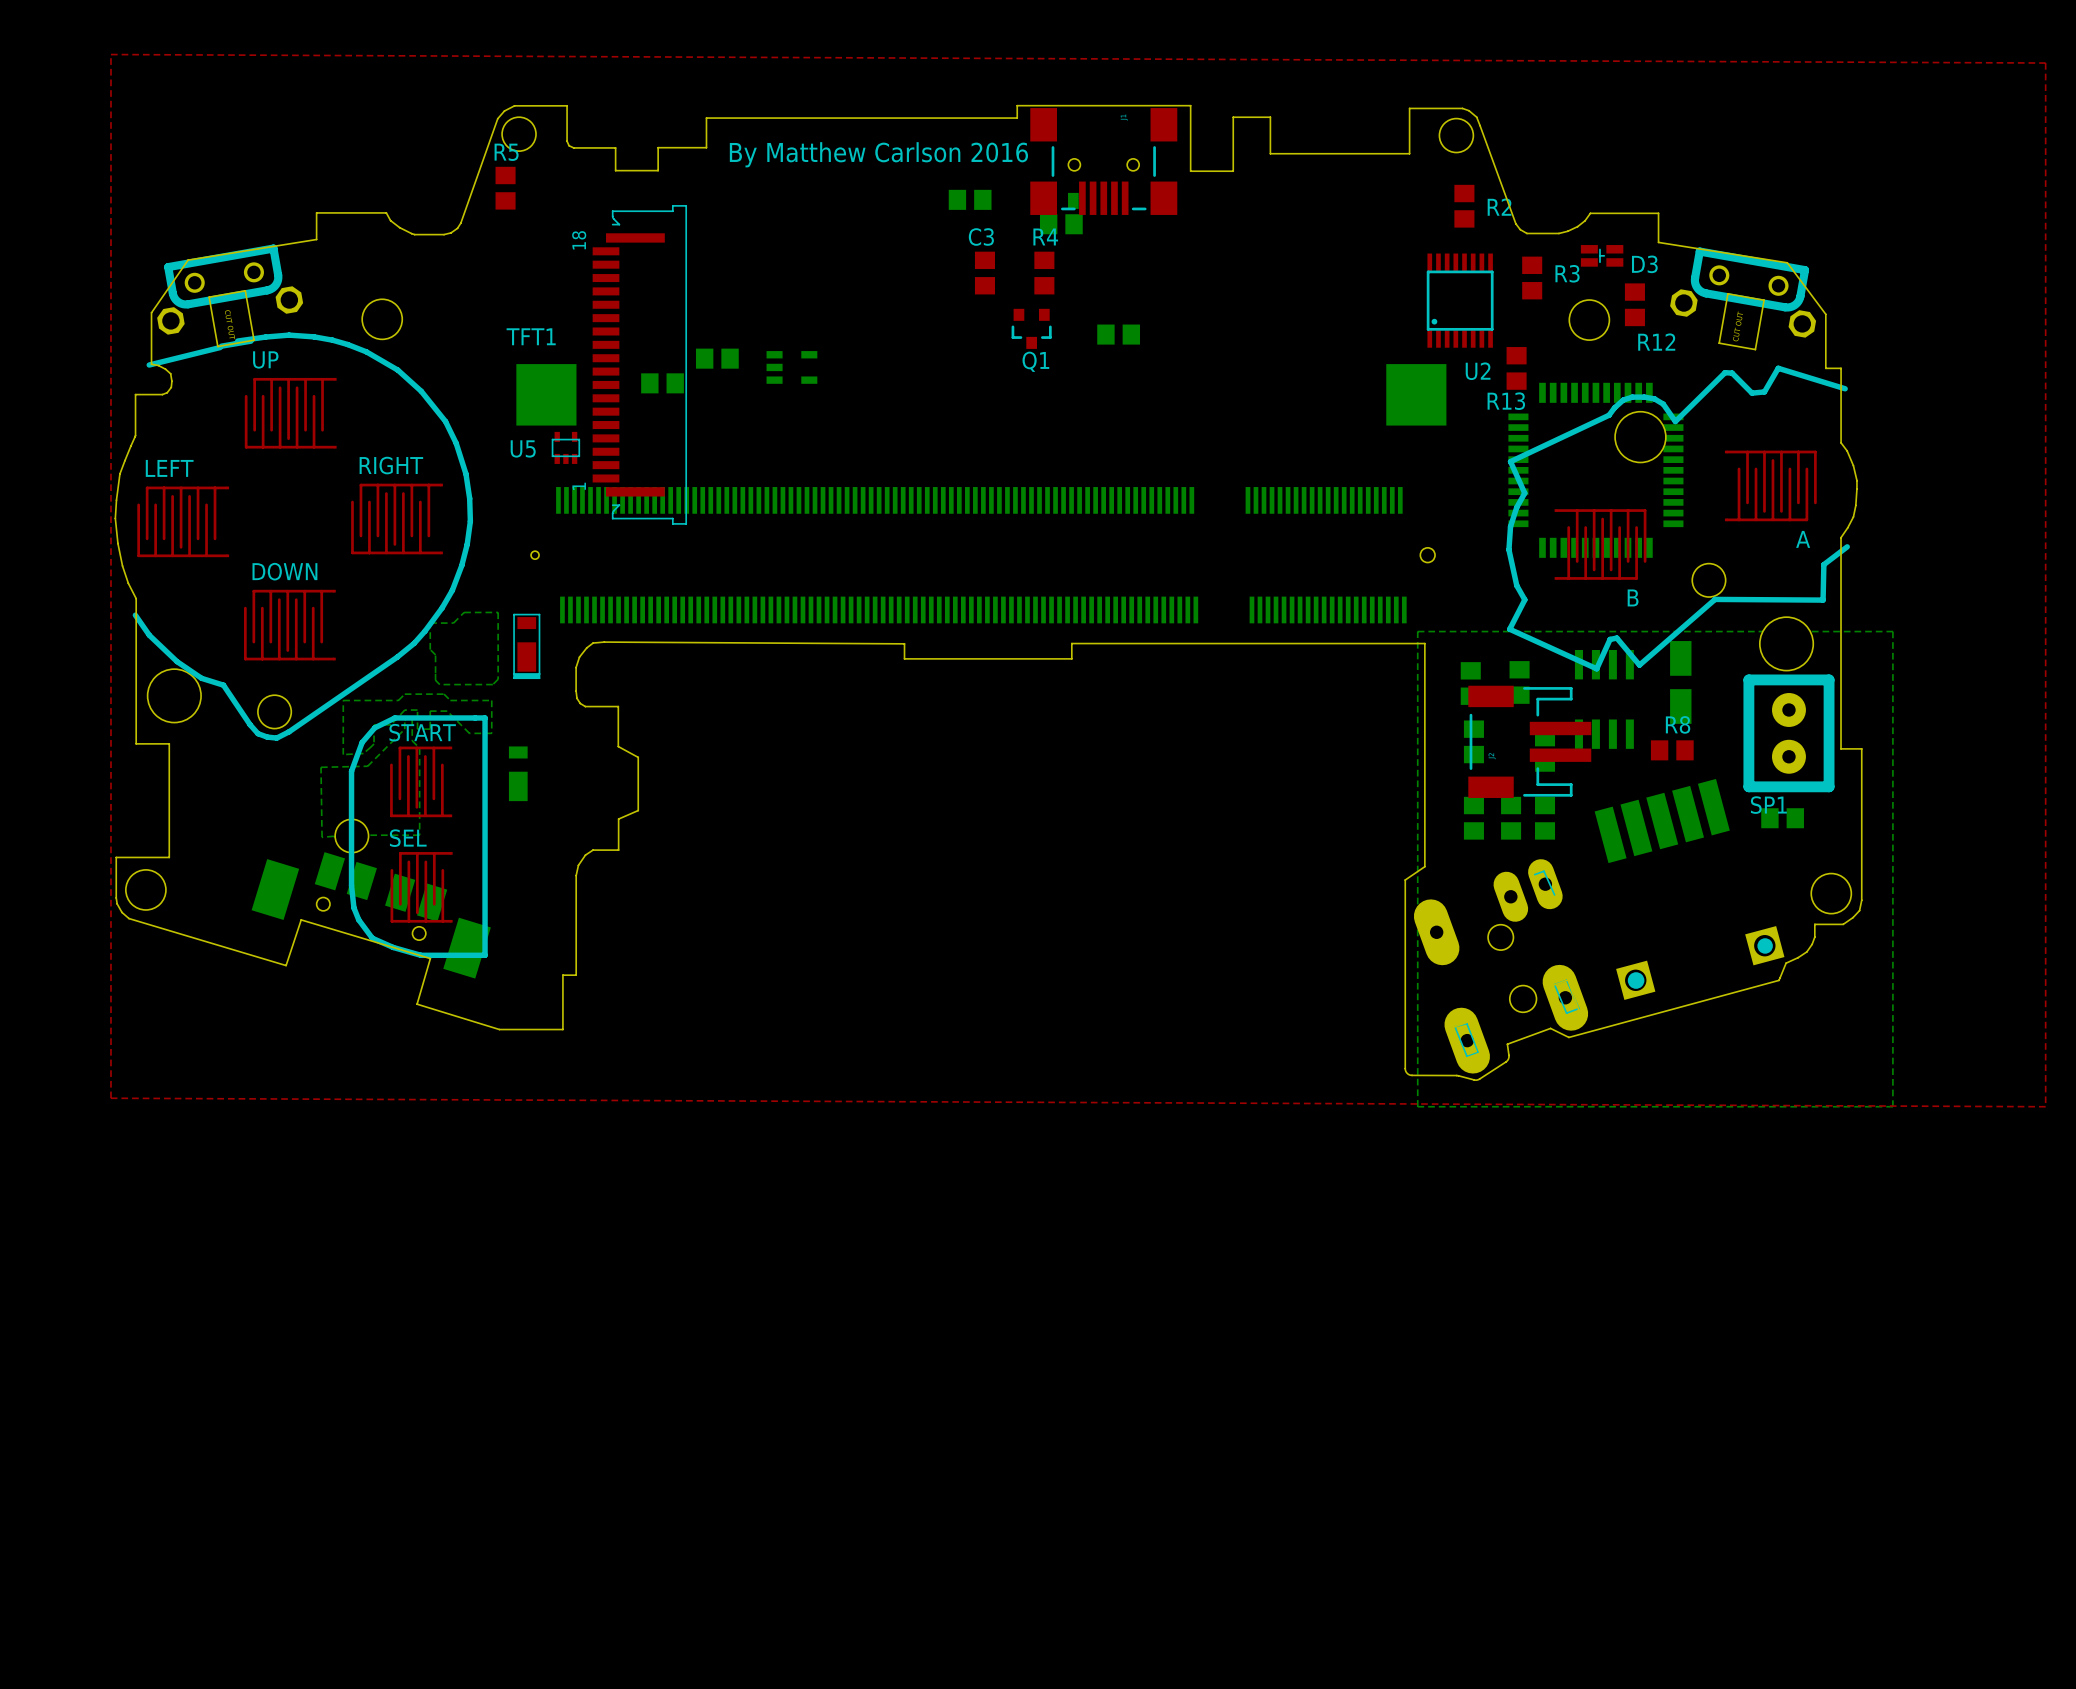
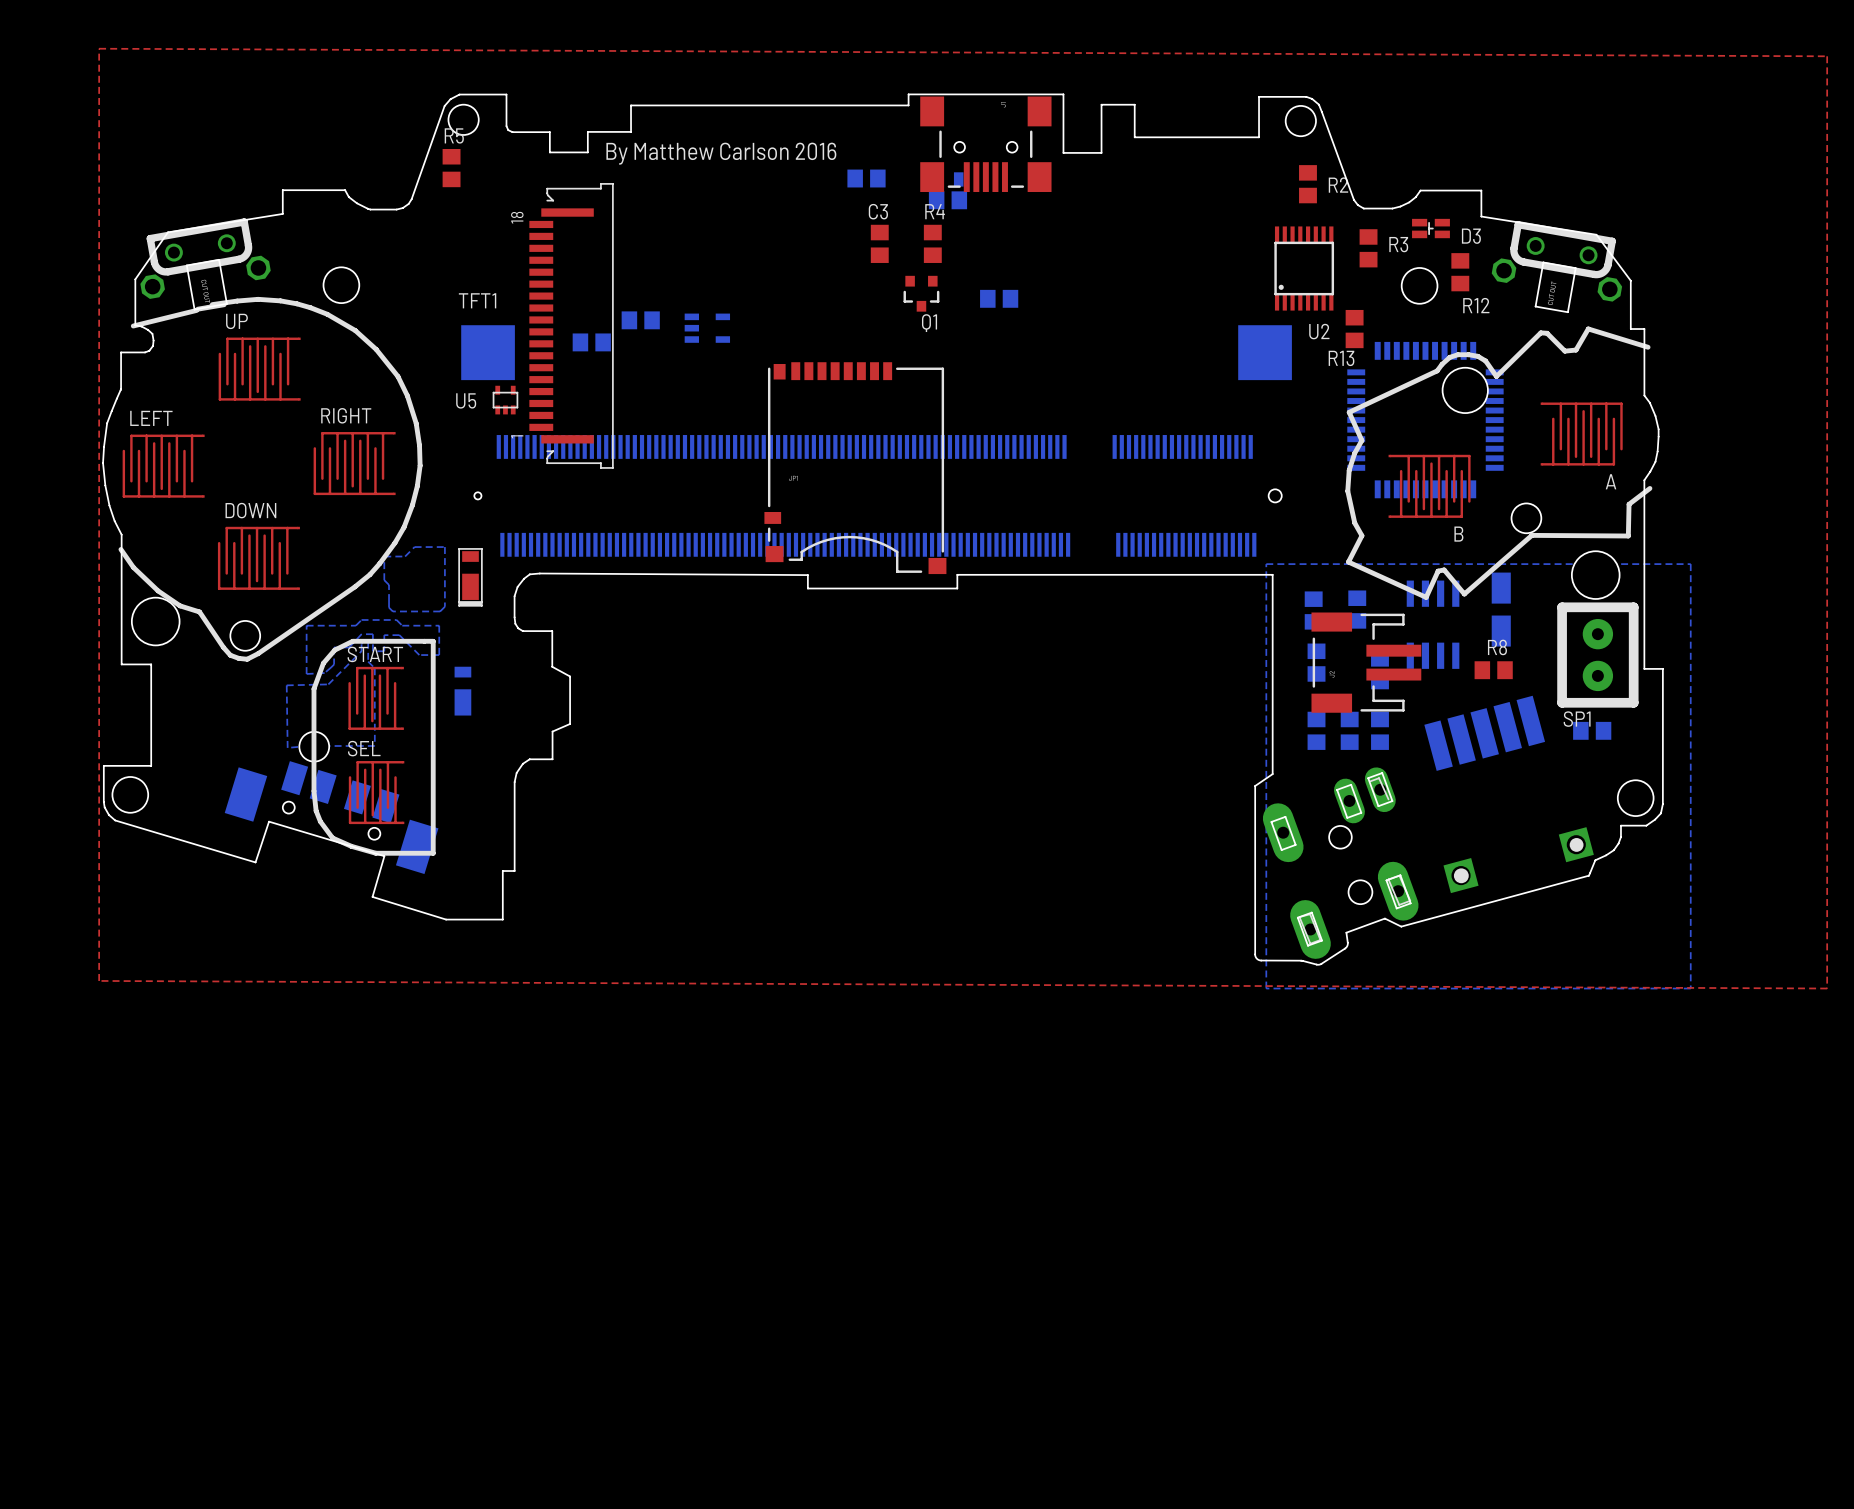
text position: By Matthew Carlson 2016 (878, 154) -> By Matthew Carlson 2016 (721, 153)
part: none -> (855, 468)

